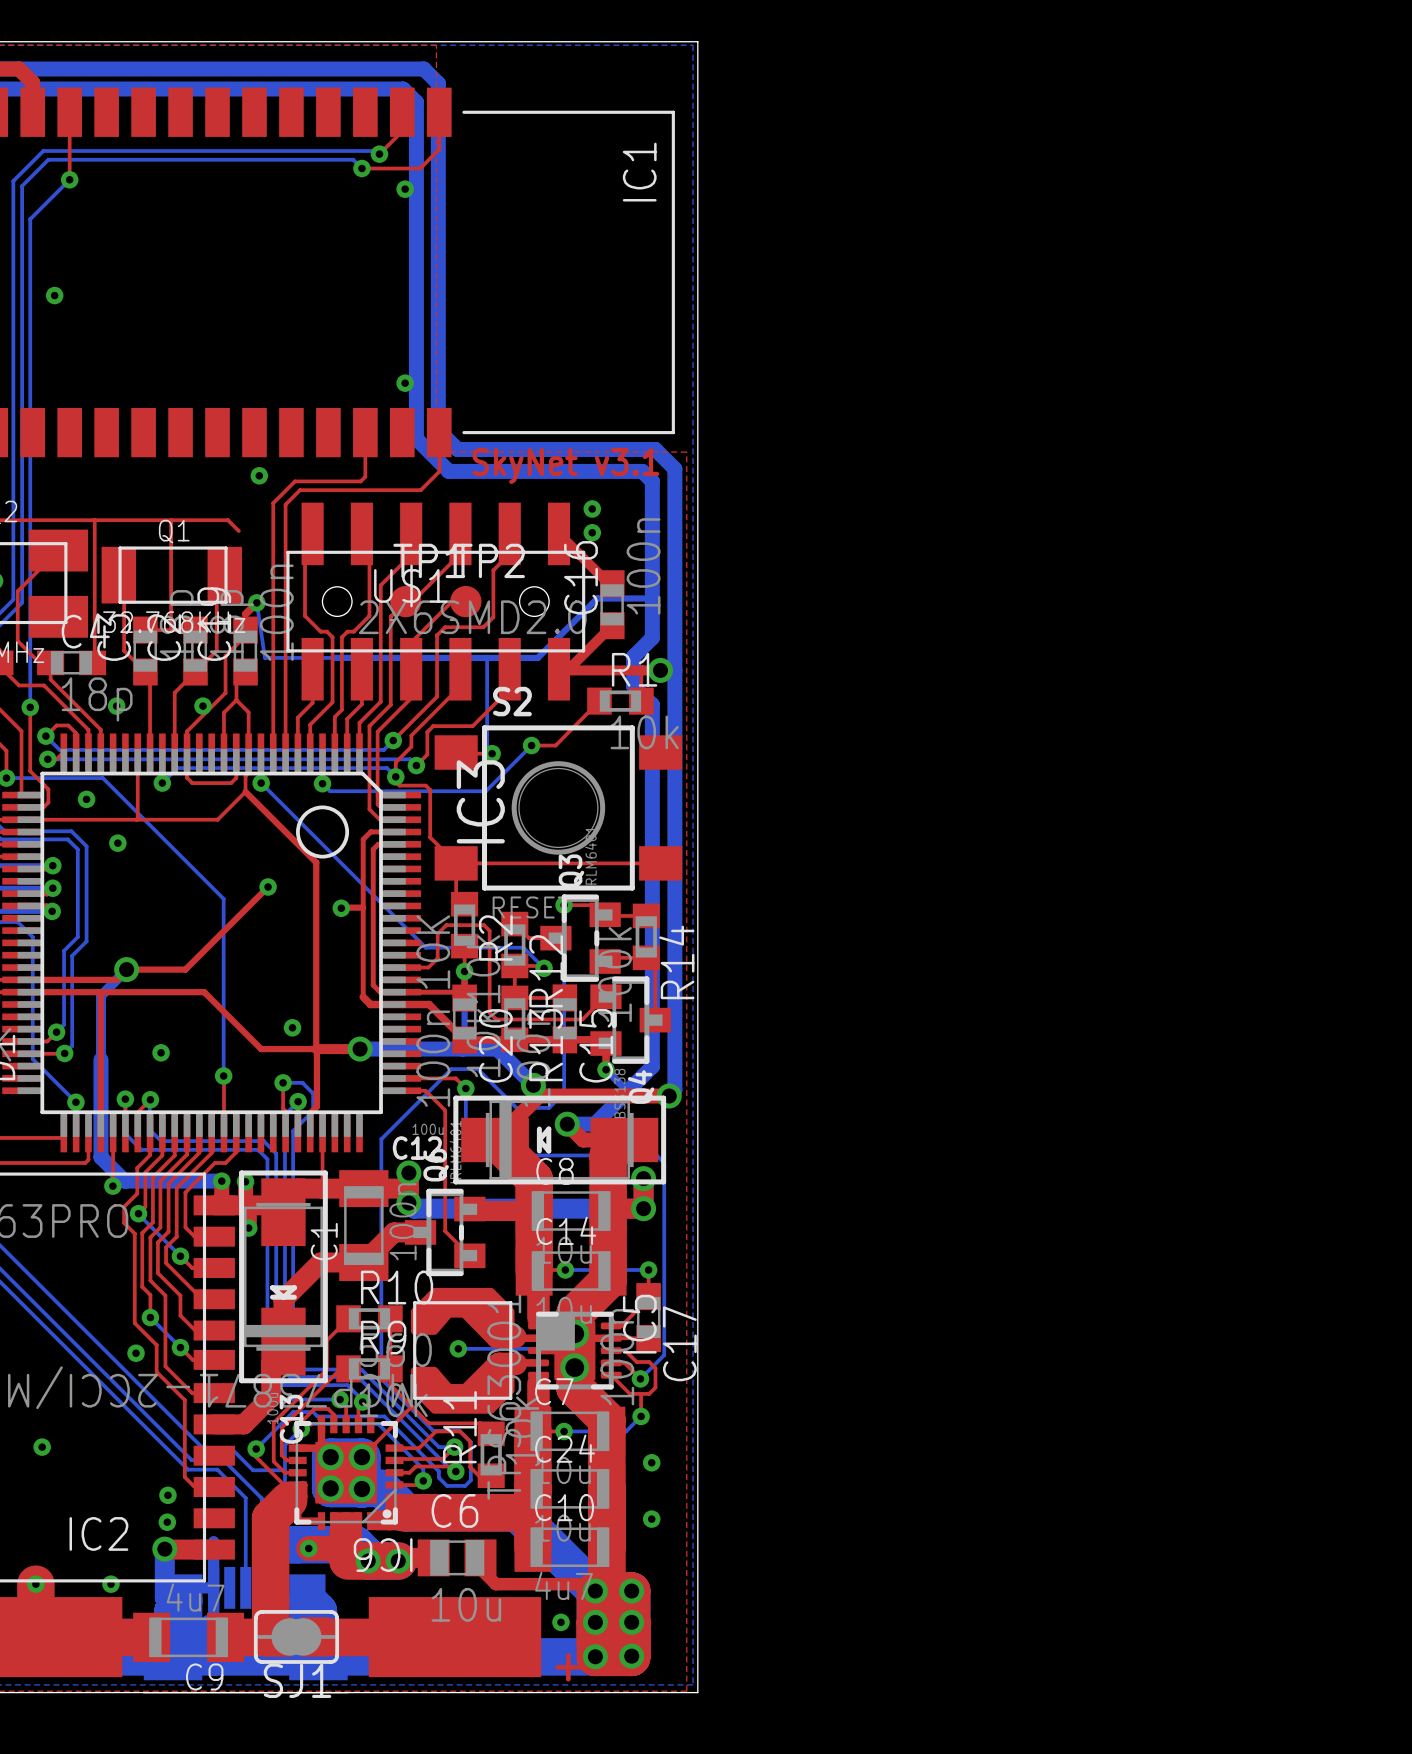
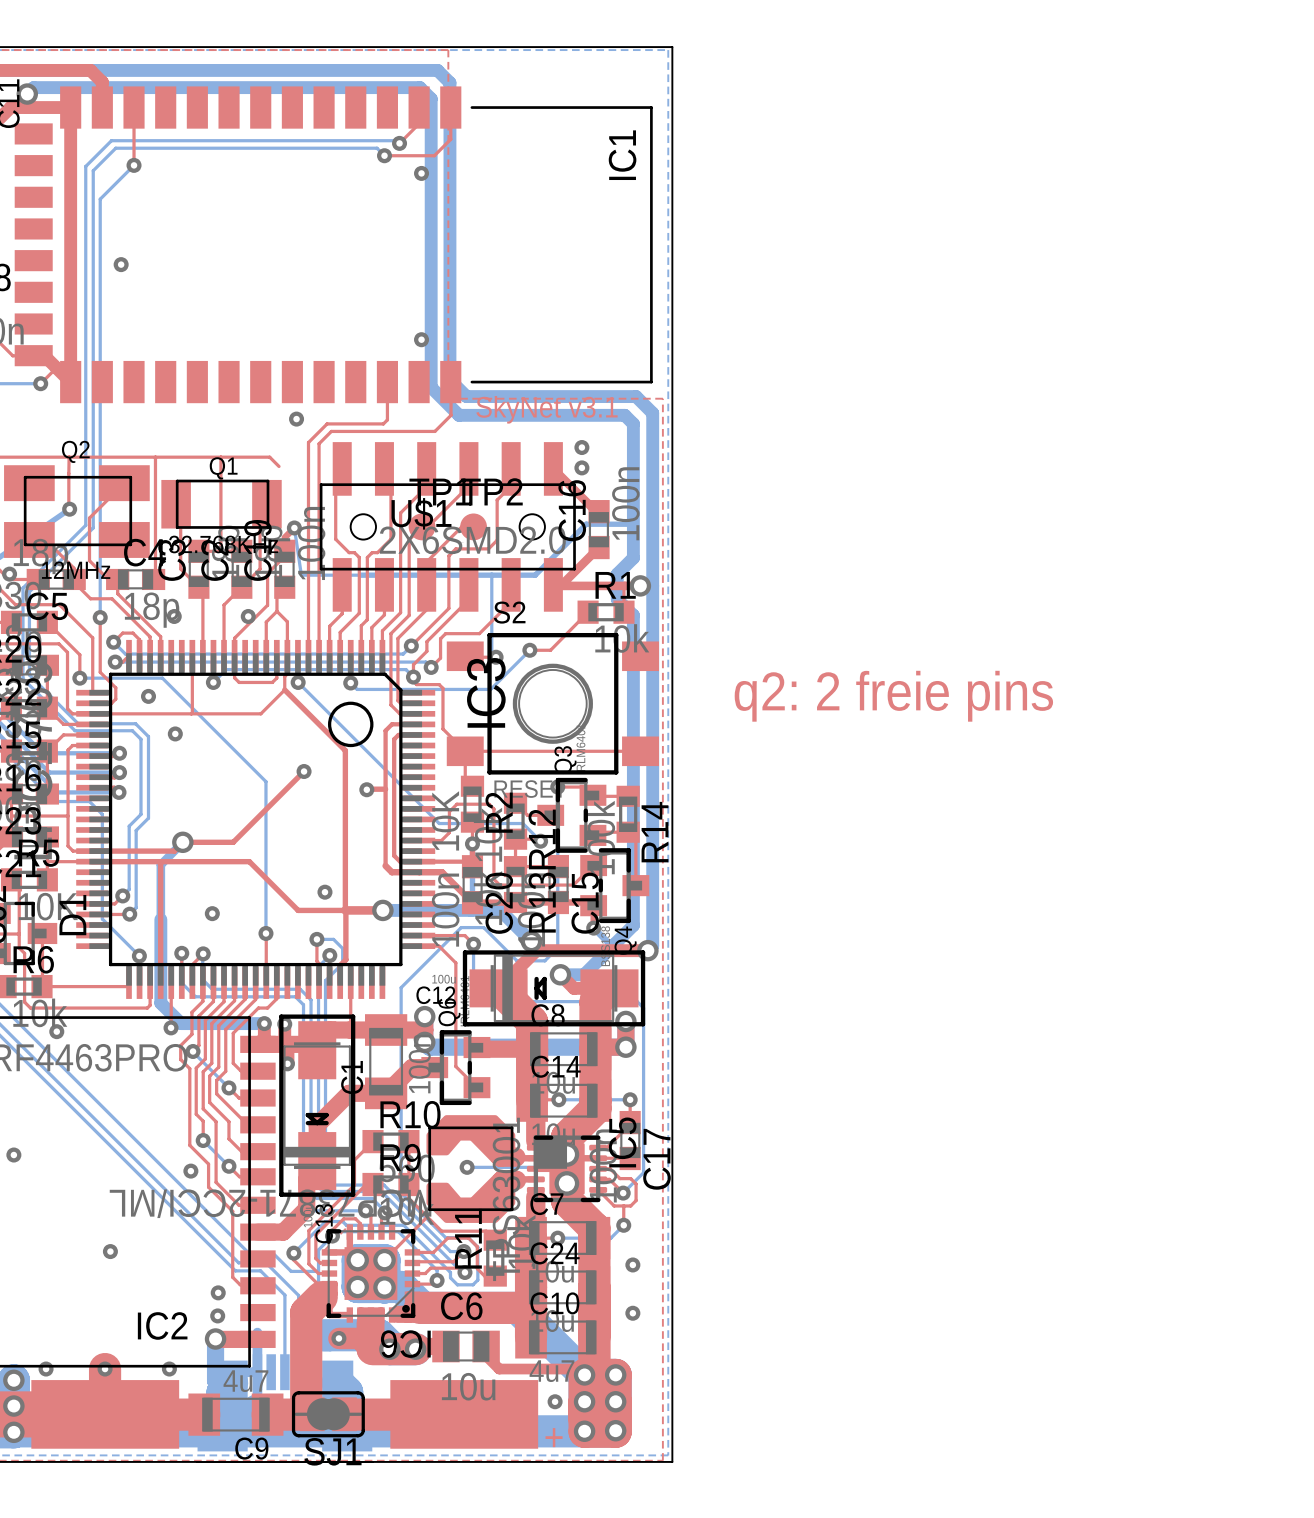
text: none -> q2: 2 freie pins (893, 696)

